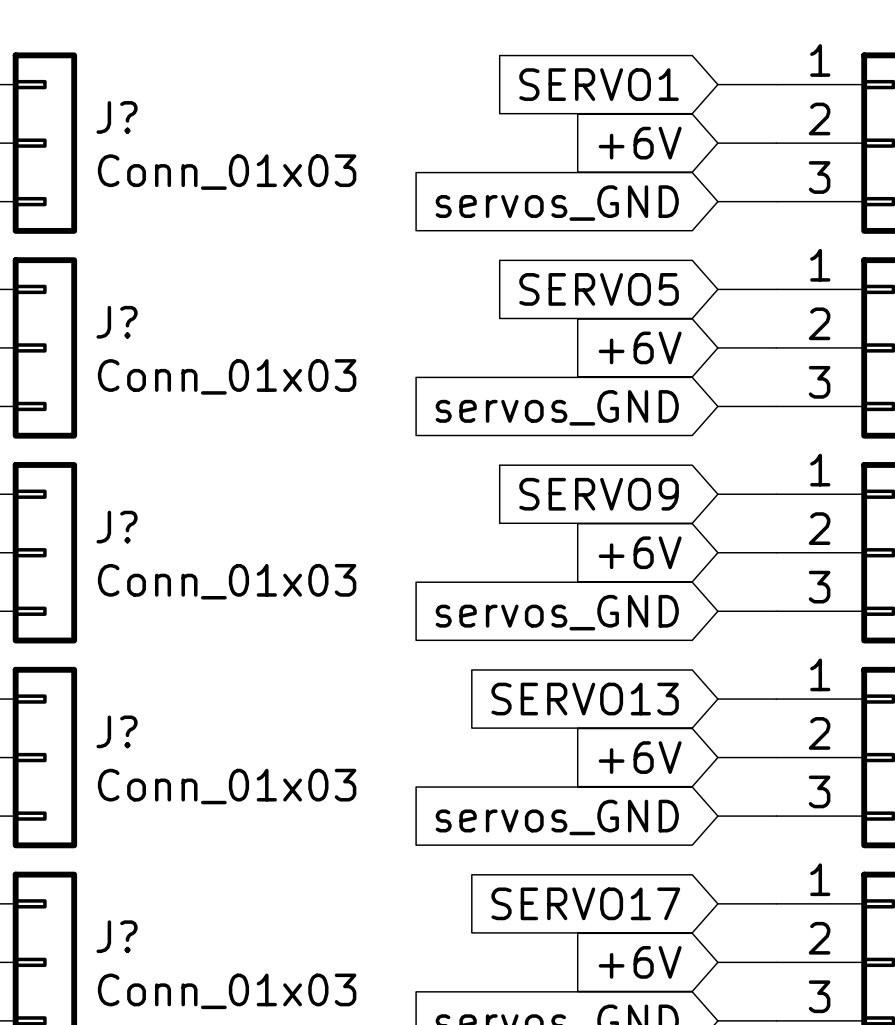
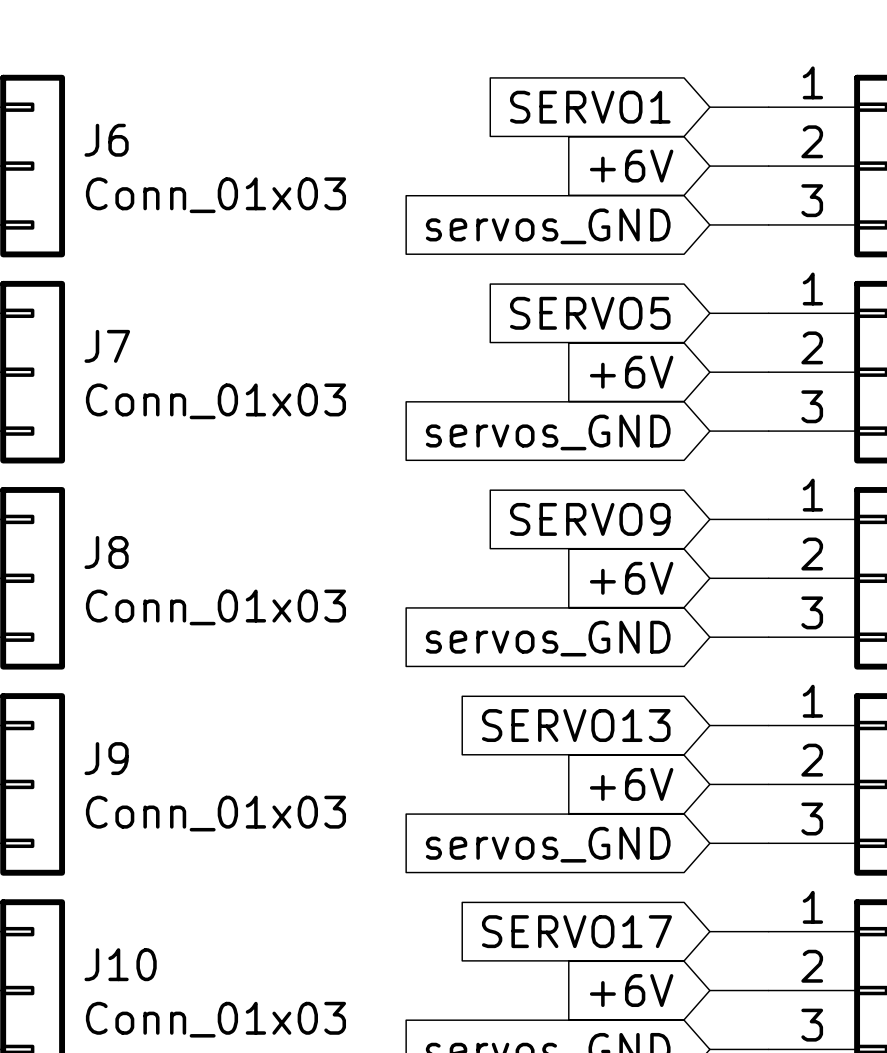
J? name: J? (117, 117) -> J6 (106, 140)
J? name: J? (117, 322) -> J7 (107, 346)
J? name: J? (117, 527) -> J8 (106, 552)
J? name: J? (117, 731) -> J9 (106, 758)
J? name: J? (117, 936) -> J10 (120, 964)

